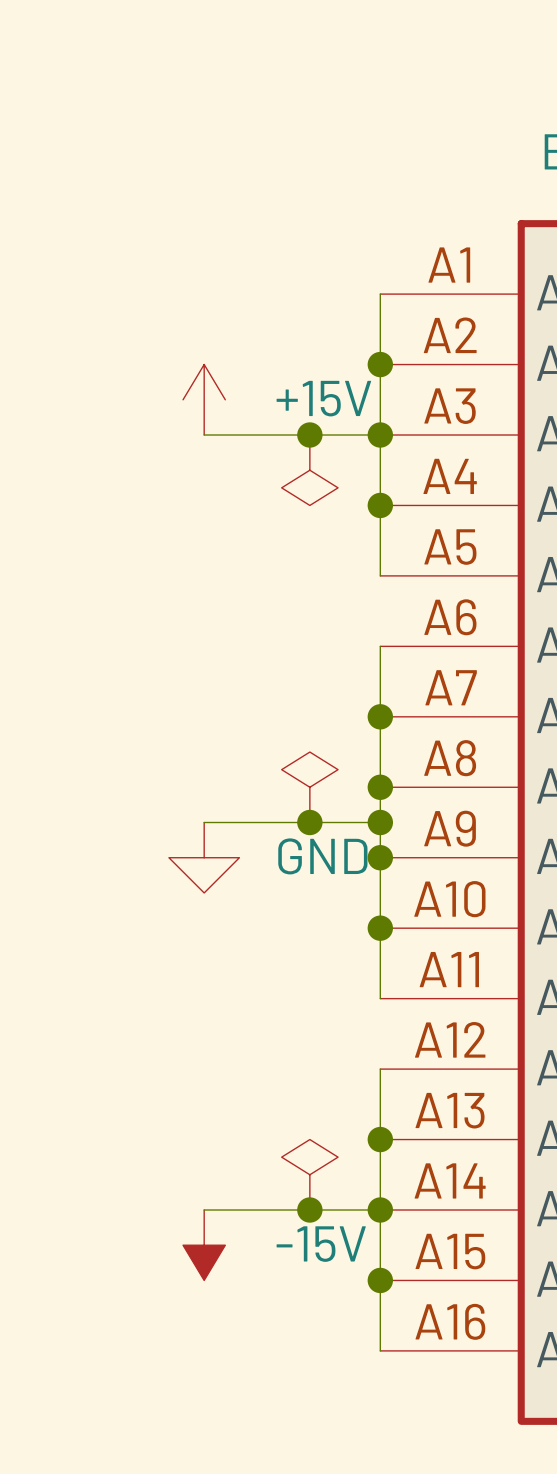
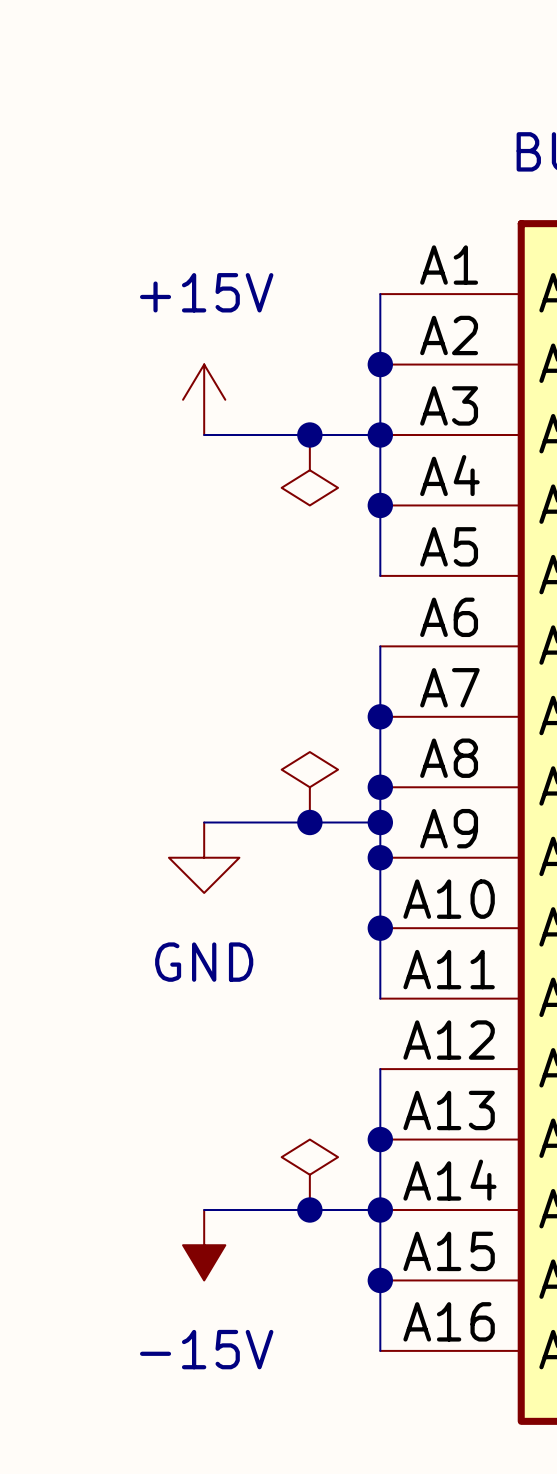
power symbol text position: +15V (323, 398) -> +15V (206, 292)
power symbol text position: GND (322, 856) -> GND (204, 962)
power symbol text position: -15V (321, 1244) -> -15V (206, 1349)

